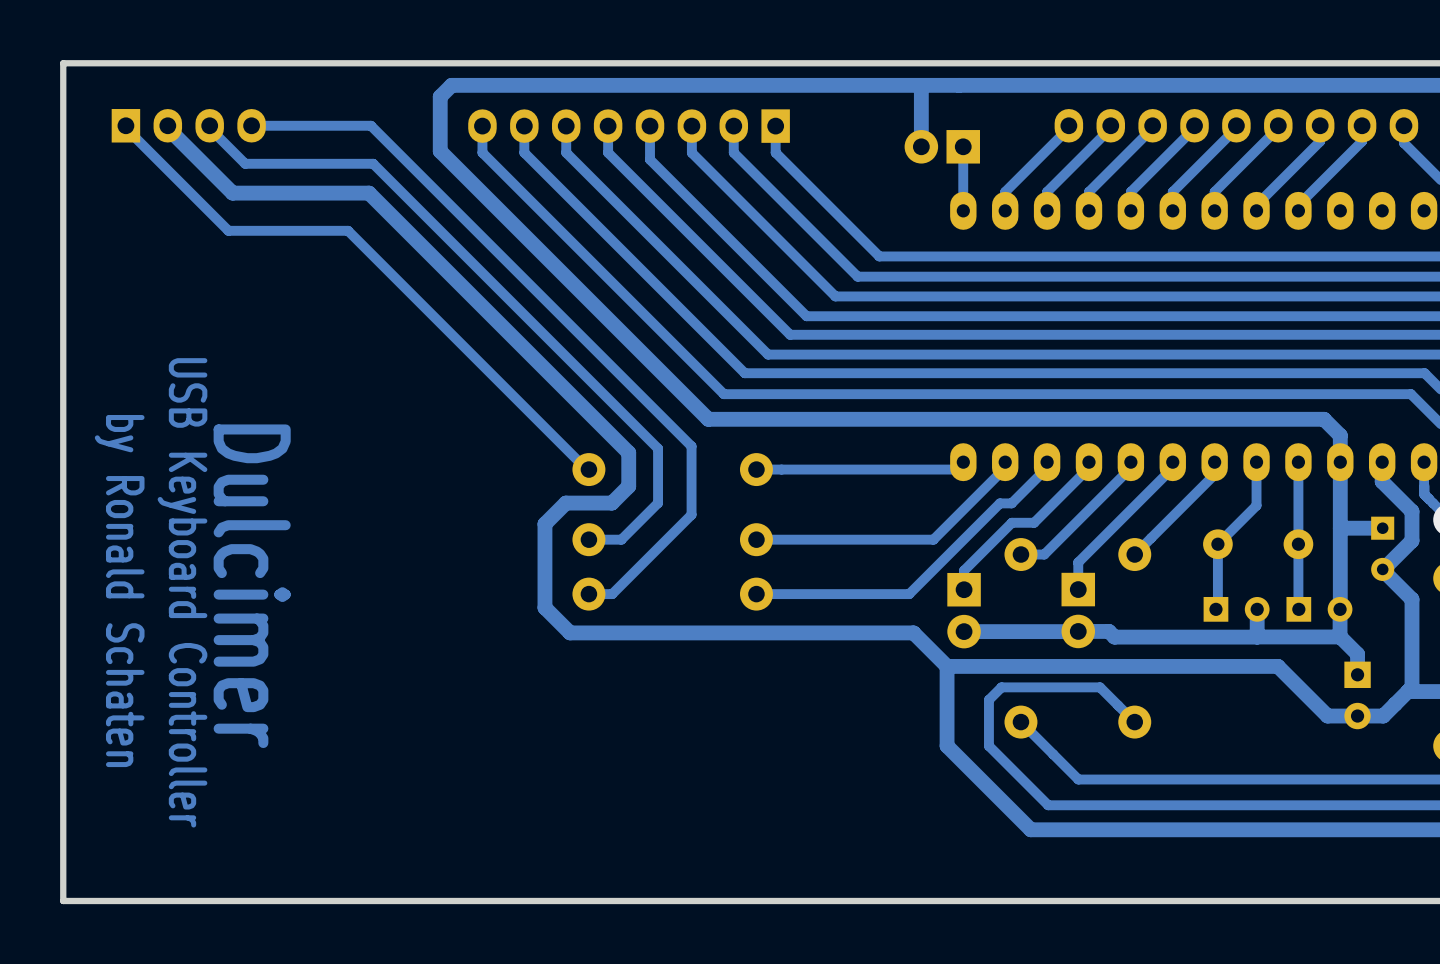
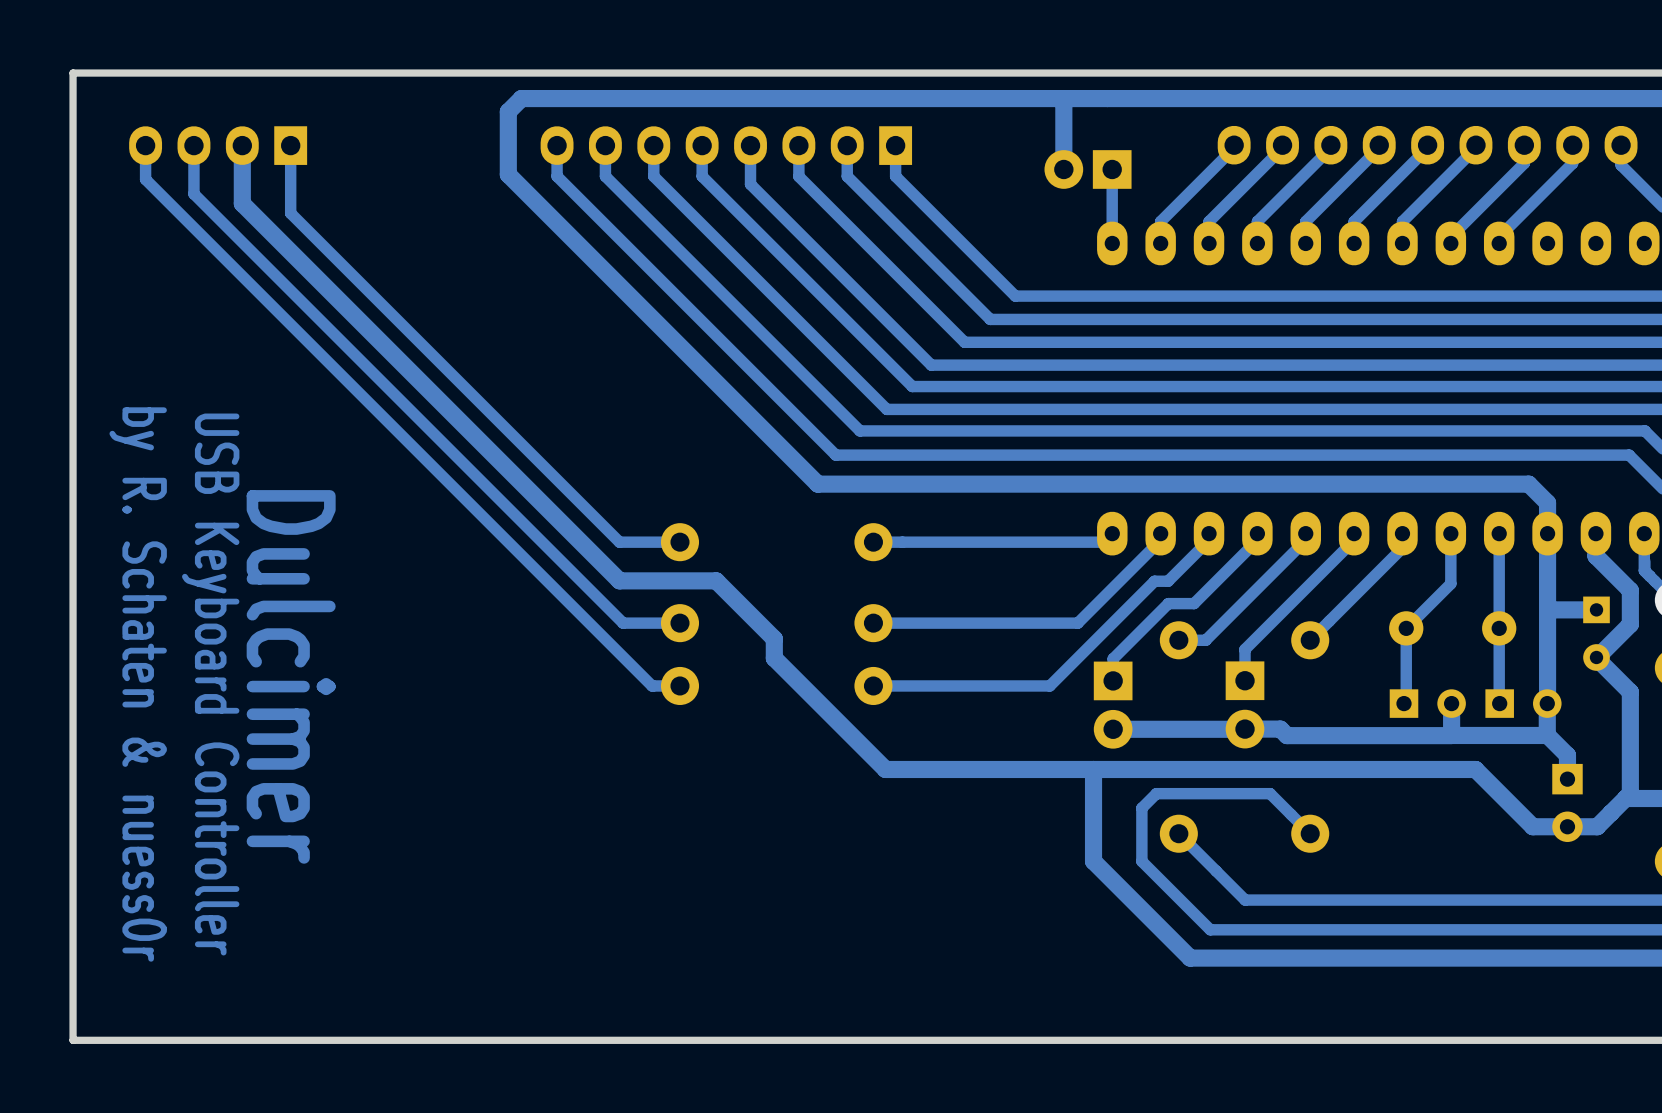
track: (167, 125) (167, 128) (232, 193) (369, 193) (628, 452) (628, 486) (611, 503) -> none
part rotation: 0° (188, 125) -> 180° (218, 145)
track: (209, 125) (209, 128) (245, 163) (373, 163) (658, 448) (658, 503) (621, 539) (588, 539) -> (193, 145) (193, 193) (623, 623) (679, 623)
track: (251, 125) (370, 125) (691, 446) (691, 514) (612, 594) (588, 594) -> (290, 145) (290, 213) (619, 542) (679, 542)
track: none -> (145, 145) (145, 179) (652, 685) (679, 685)
track: none -> (242, 145) (242, 203) (619, 580) (653, 580)
track: (125, 128) (228, 230) (348, 230) (588, 471) -> none
track: (565, 503) (544, 524) (544, 607) (570, 632) (913, 632) (947, 666) -> (706, 580) (716, 580) (774, 638) (774, 658) (885, 769) (1093, 769)
text: by Ronald Schaten (119, 591) -> by R. Schaten & nuess0r (138, 684)

